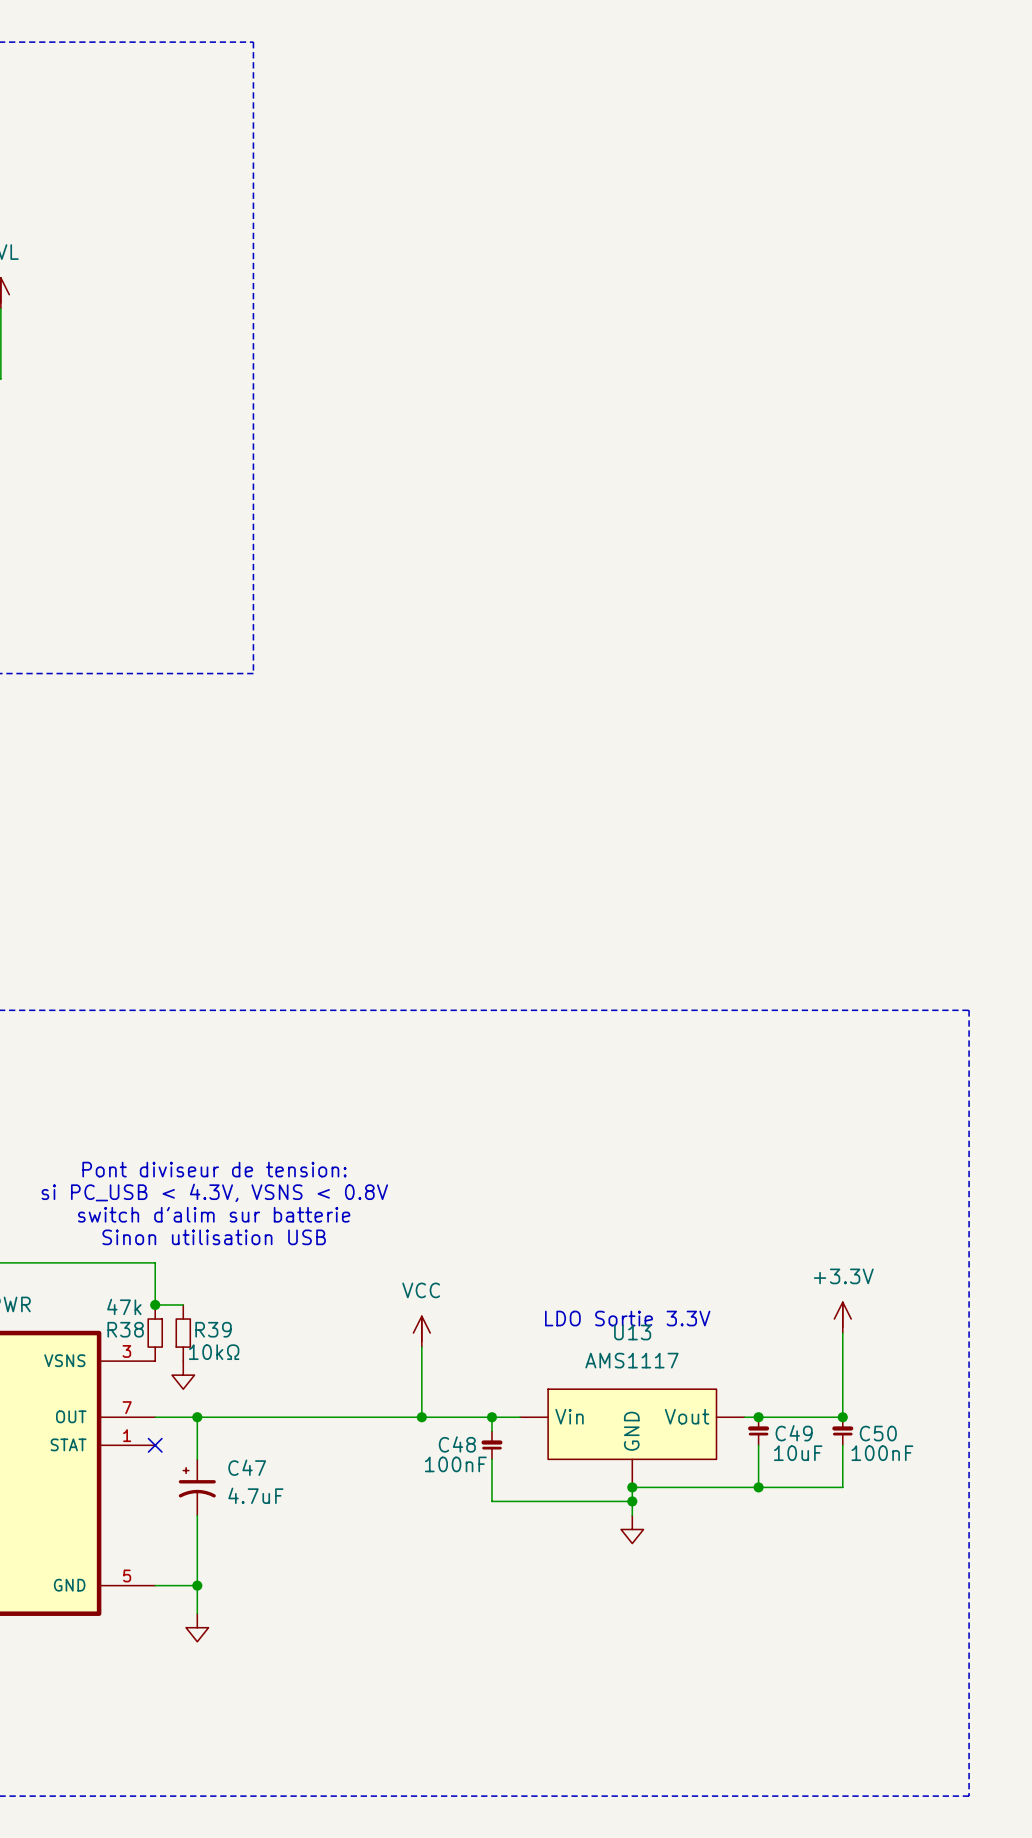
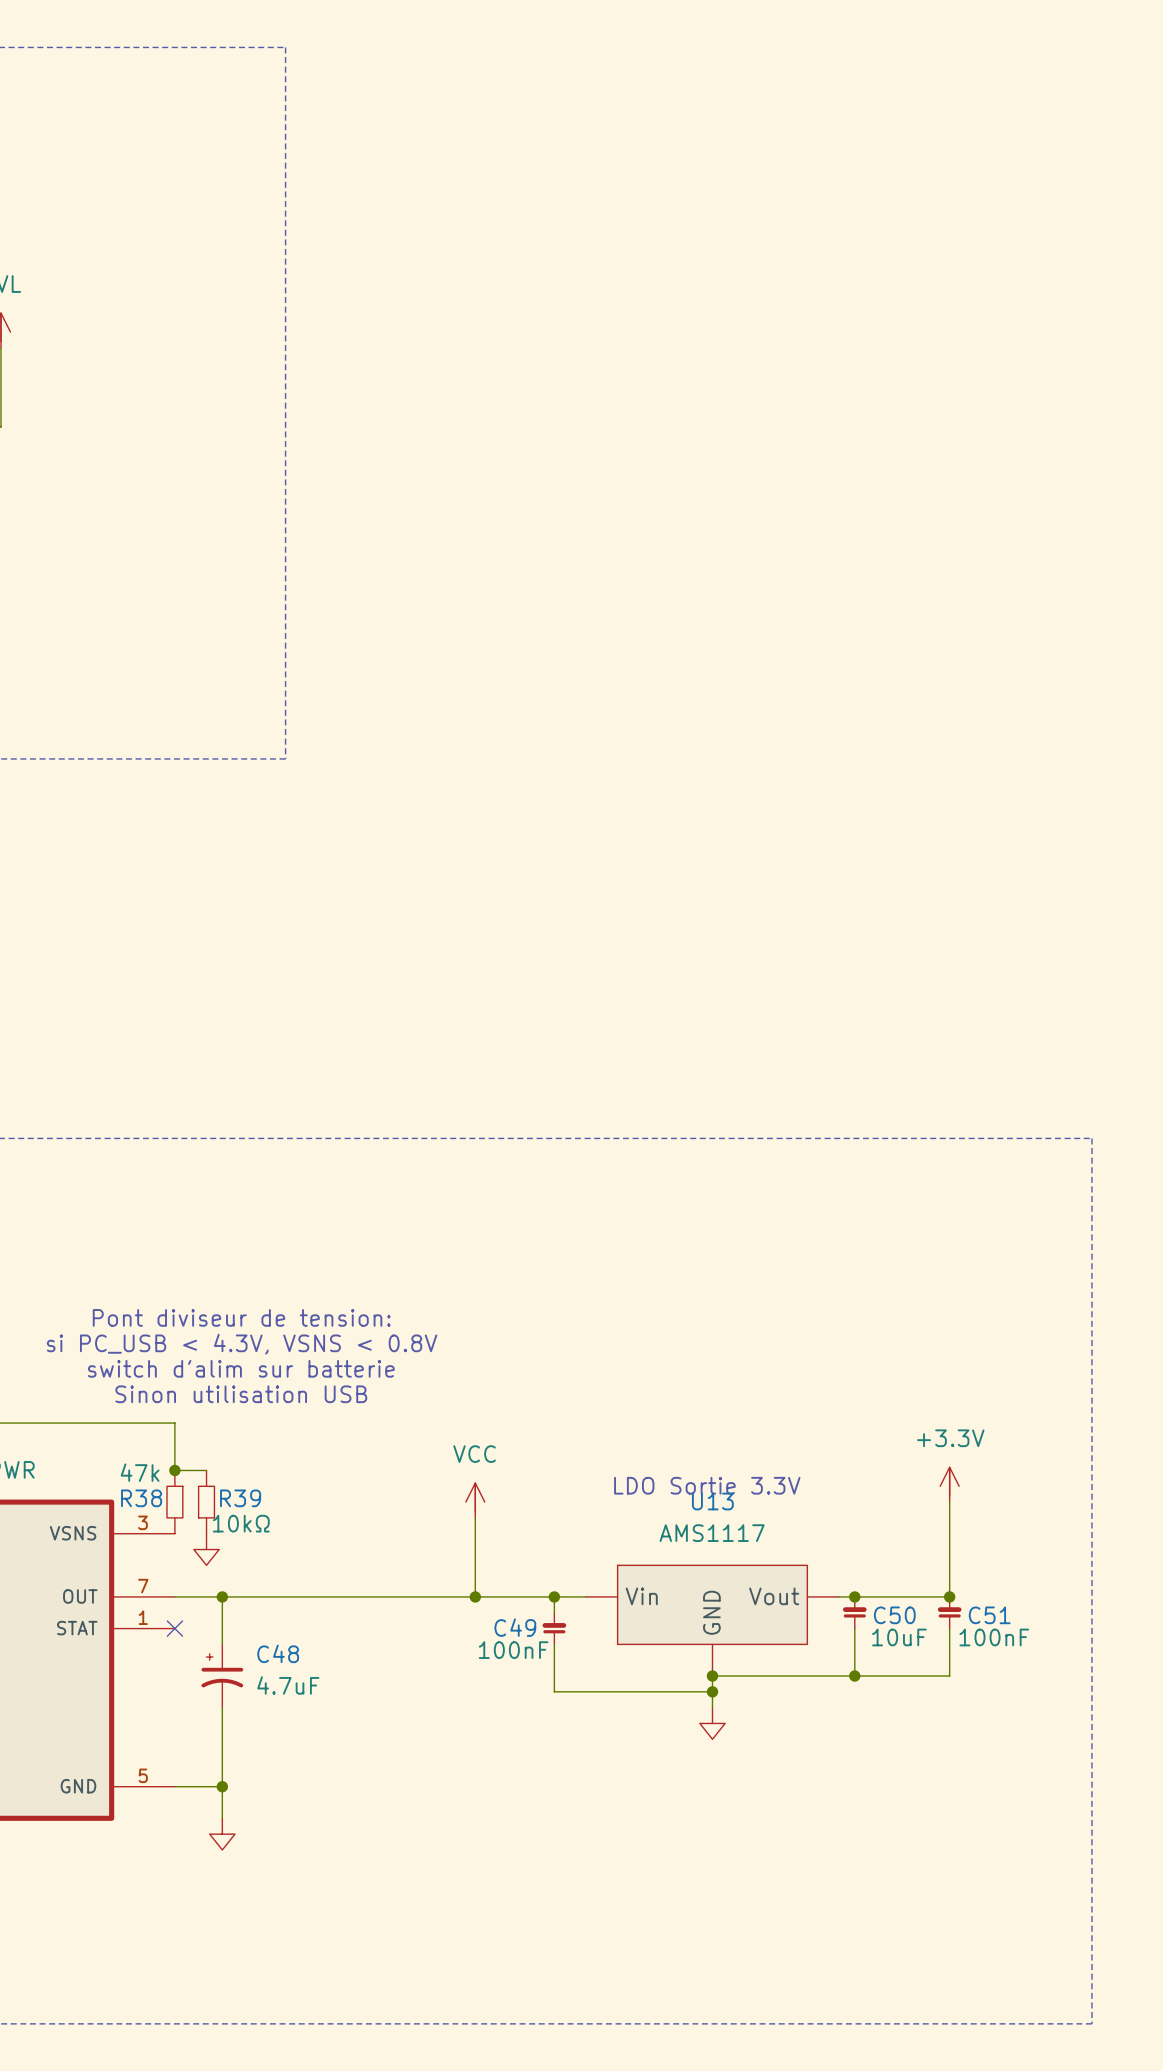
C49 name: C49 (794, 1433) -> C50 (894, 1615)
C50 name: C50 (878, 1433) -> C51 (989, 1615)
C48 name: C48 (457, 1444) -> C49 (515, 1627)
C47 name: C47 (247, 1467) -> C48 (278, 1653)

